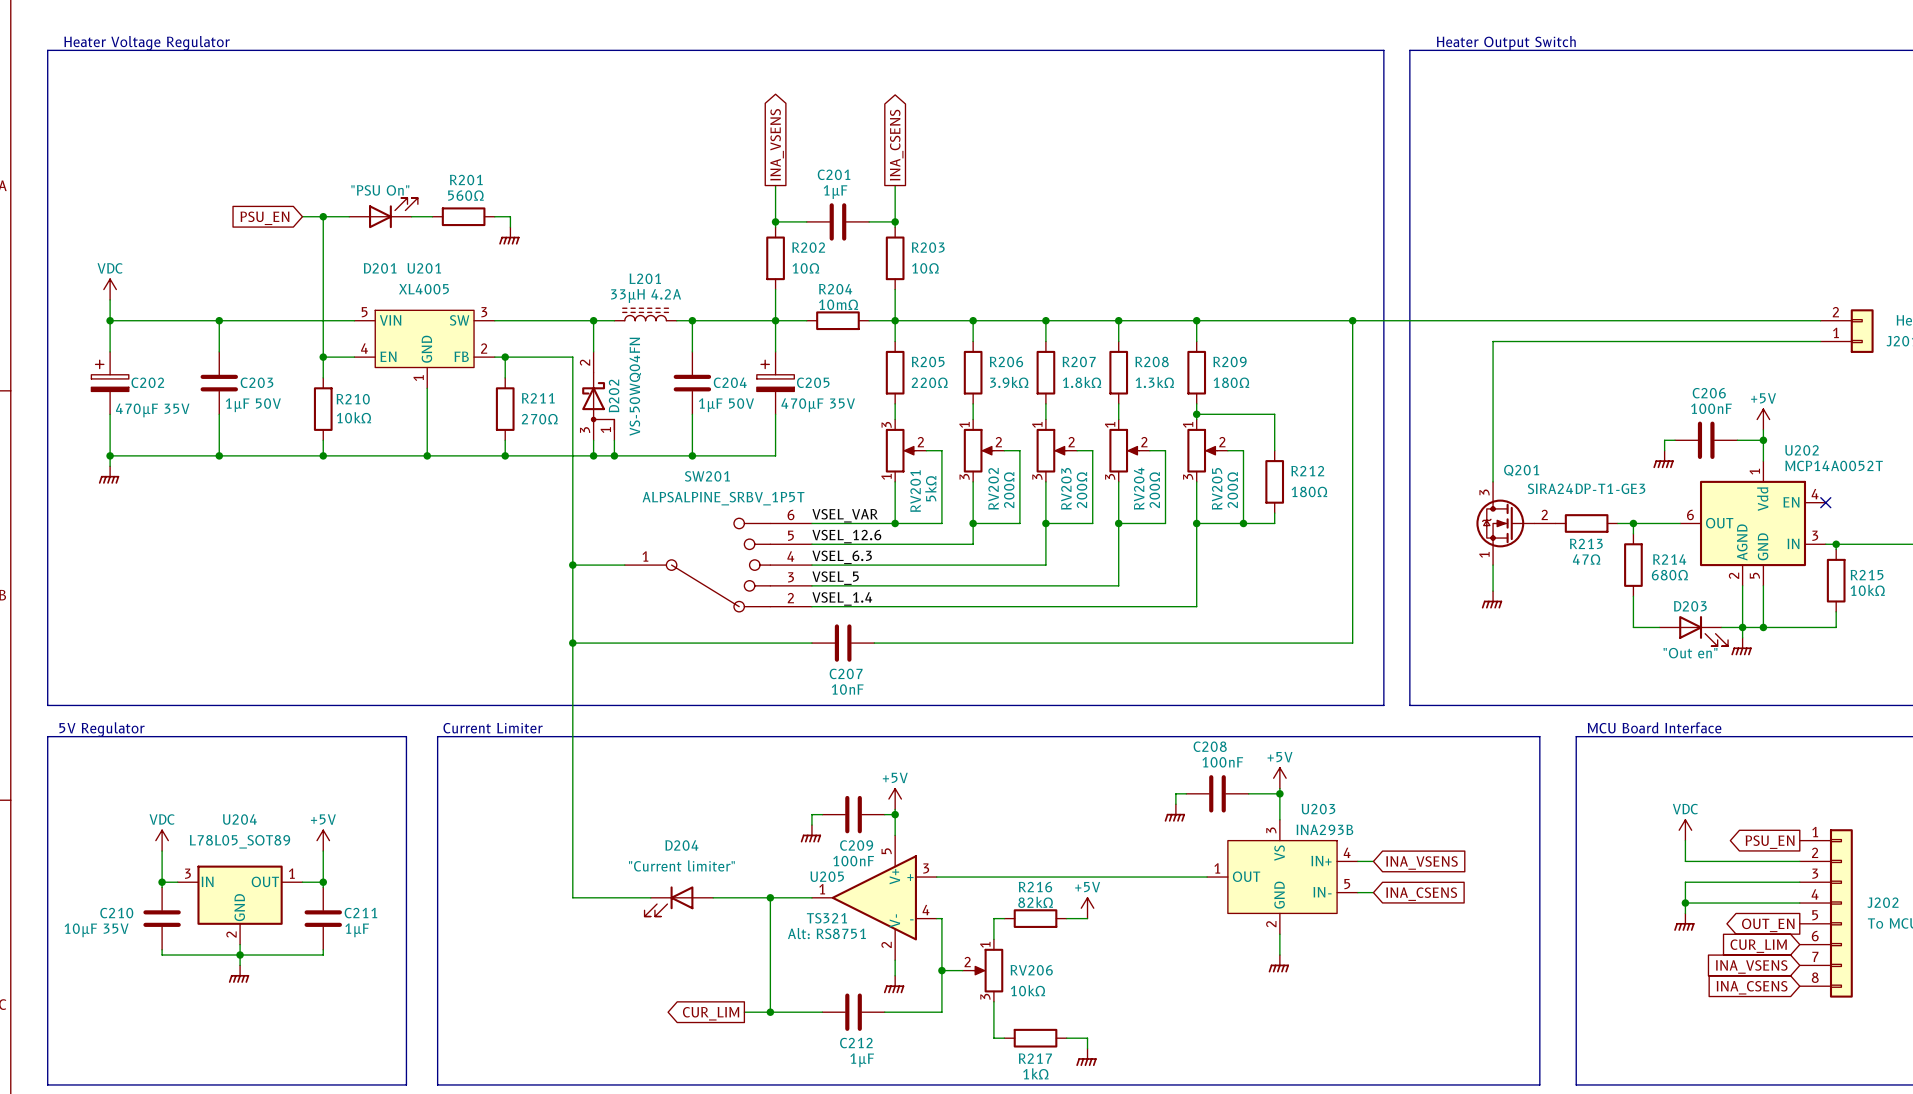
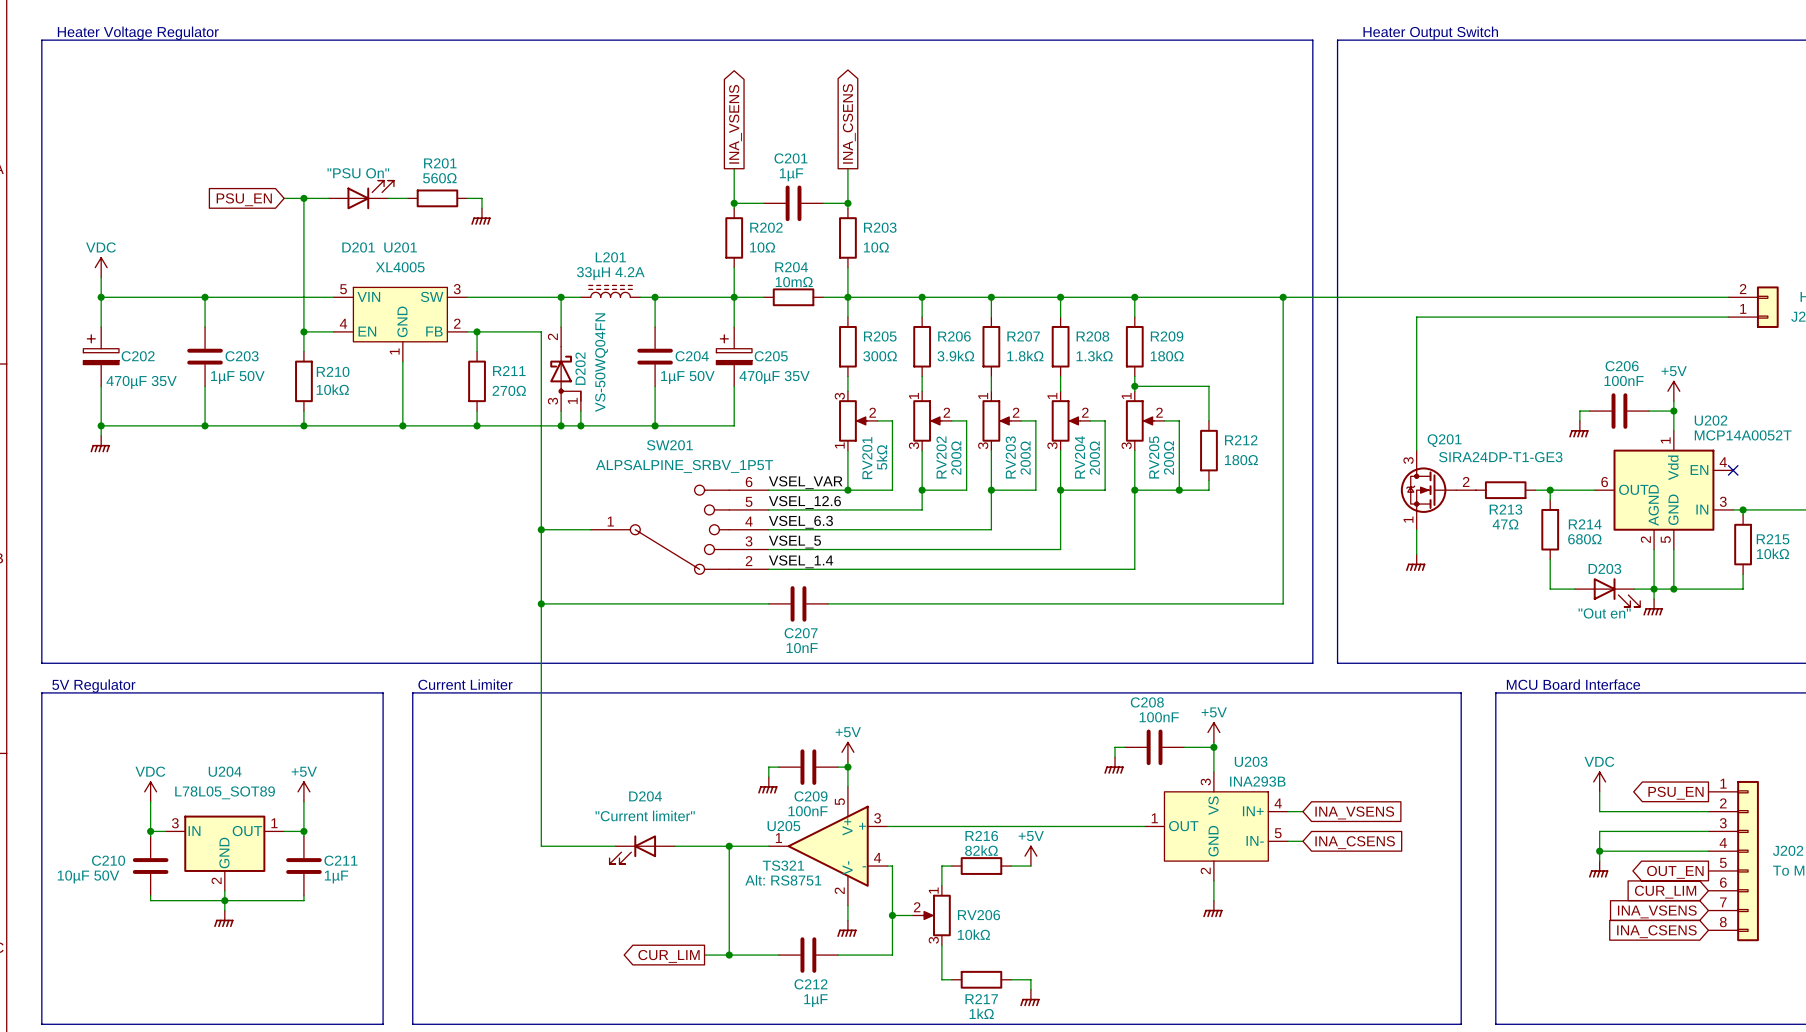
R205 value: 220Ω (929, 382) -> 300Ω (880, 356)
C210 value: 10µF 35V (96, 930) -> 10µF 50V (88, 876)

